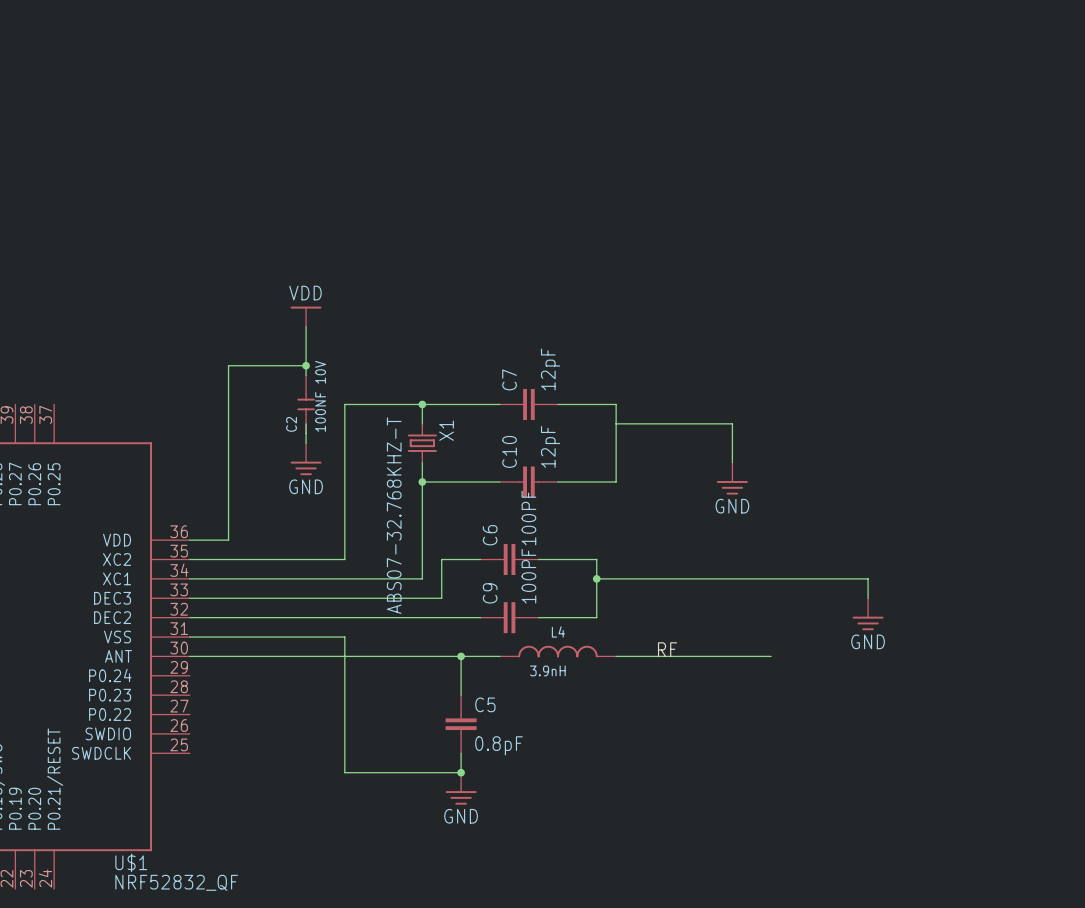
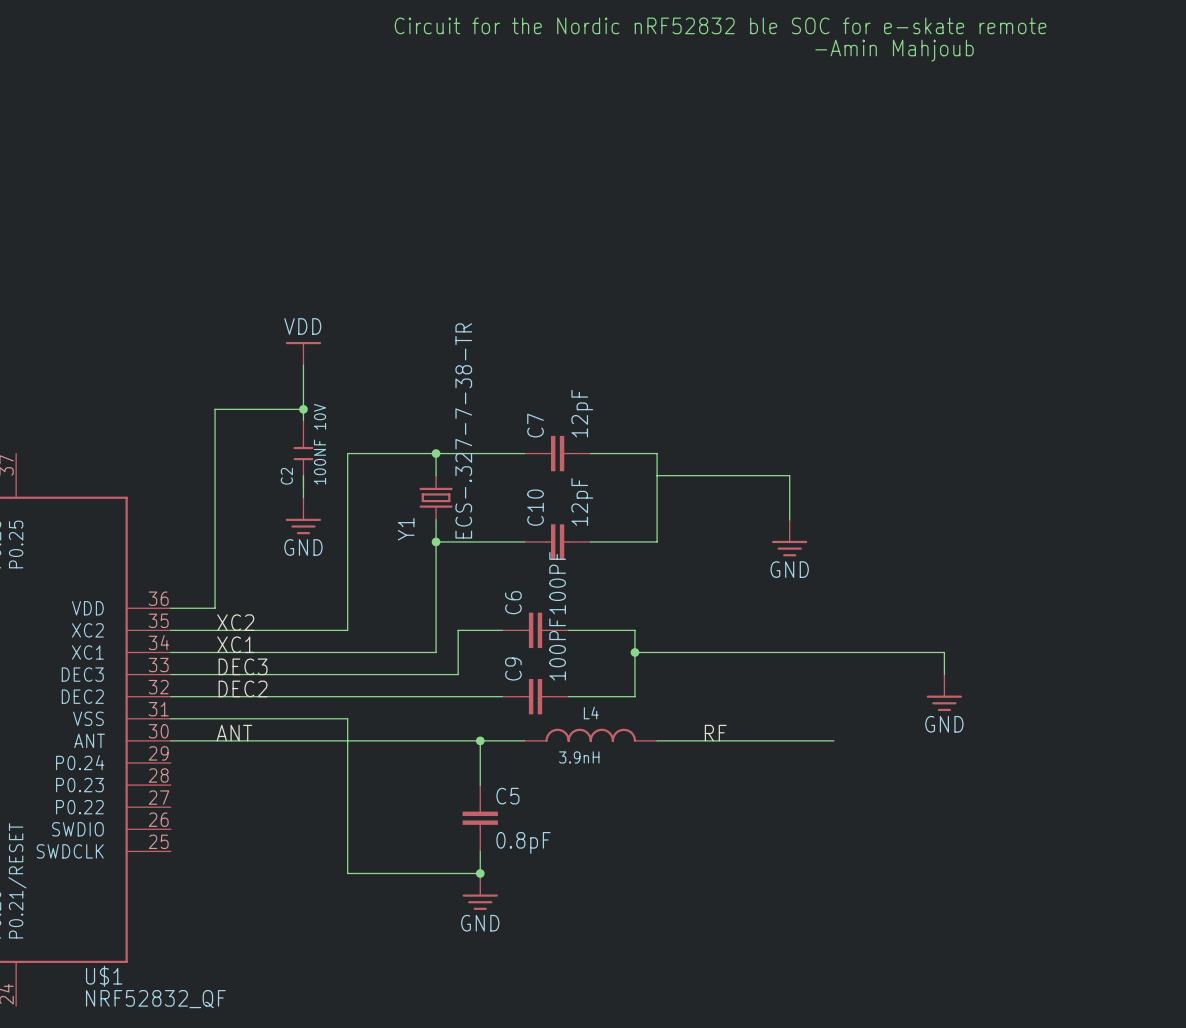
text: none -> Circuit for the Nordic nRF52832 ble SOC for e-skate remote (720, 25)
text: none -> -Amin Mahjoub (894, 50)
X1 name: X1 (446, 430) -> Y1 (406, 529)
X1 value: ABS07-32.768KHZ-T (394, 515) -> ECS-.327-7-38-TR (463, 430)
label: none -> XC2 (235, 622)
label: none -> XC1 (235, 644)
label: none -> DEC3 (243, 666)
label: none -> DEC2 (243, 688)
label: none -> ANT (234, 733)

